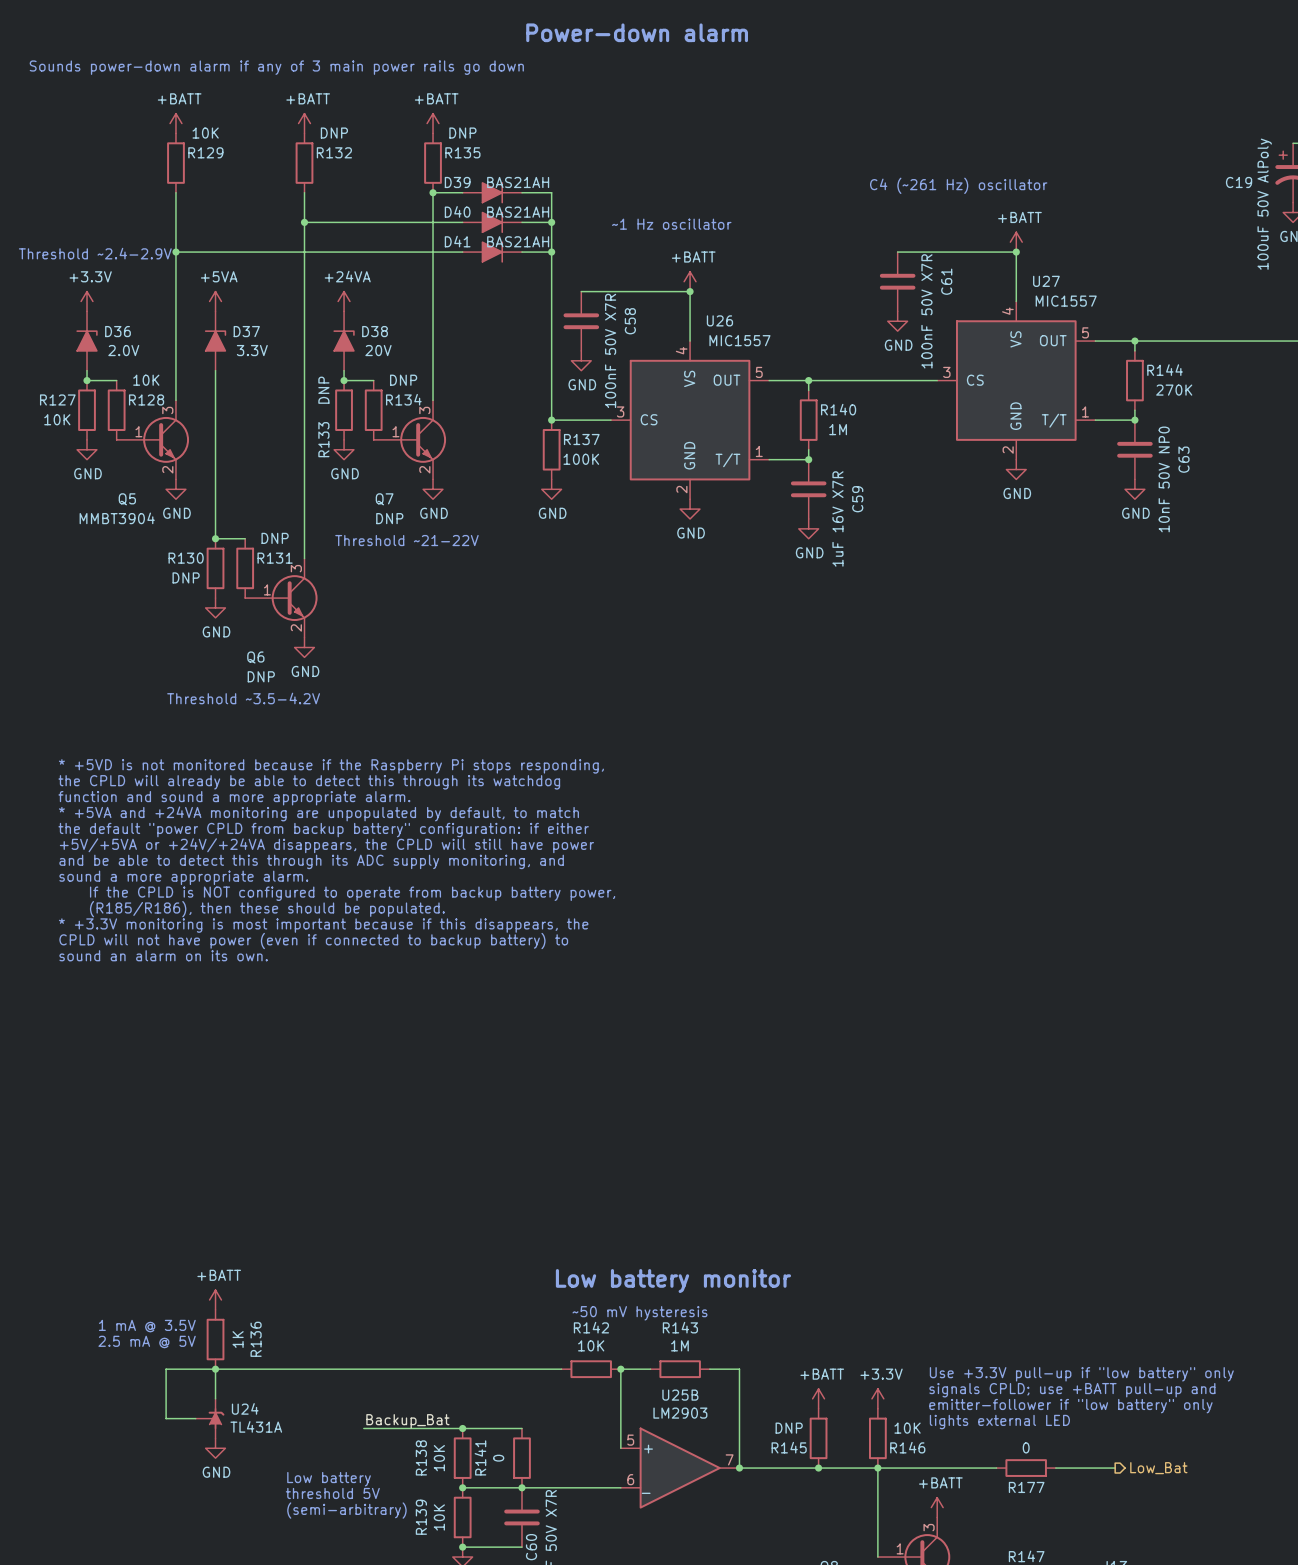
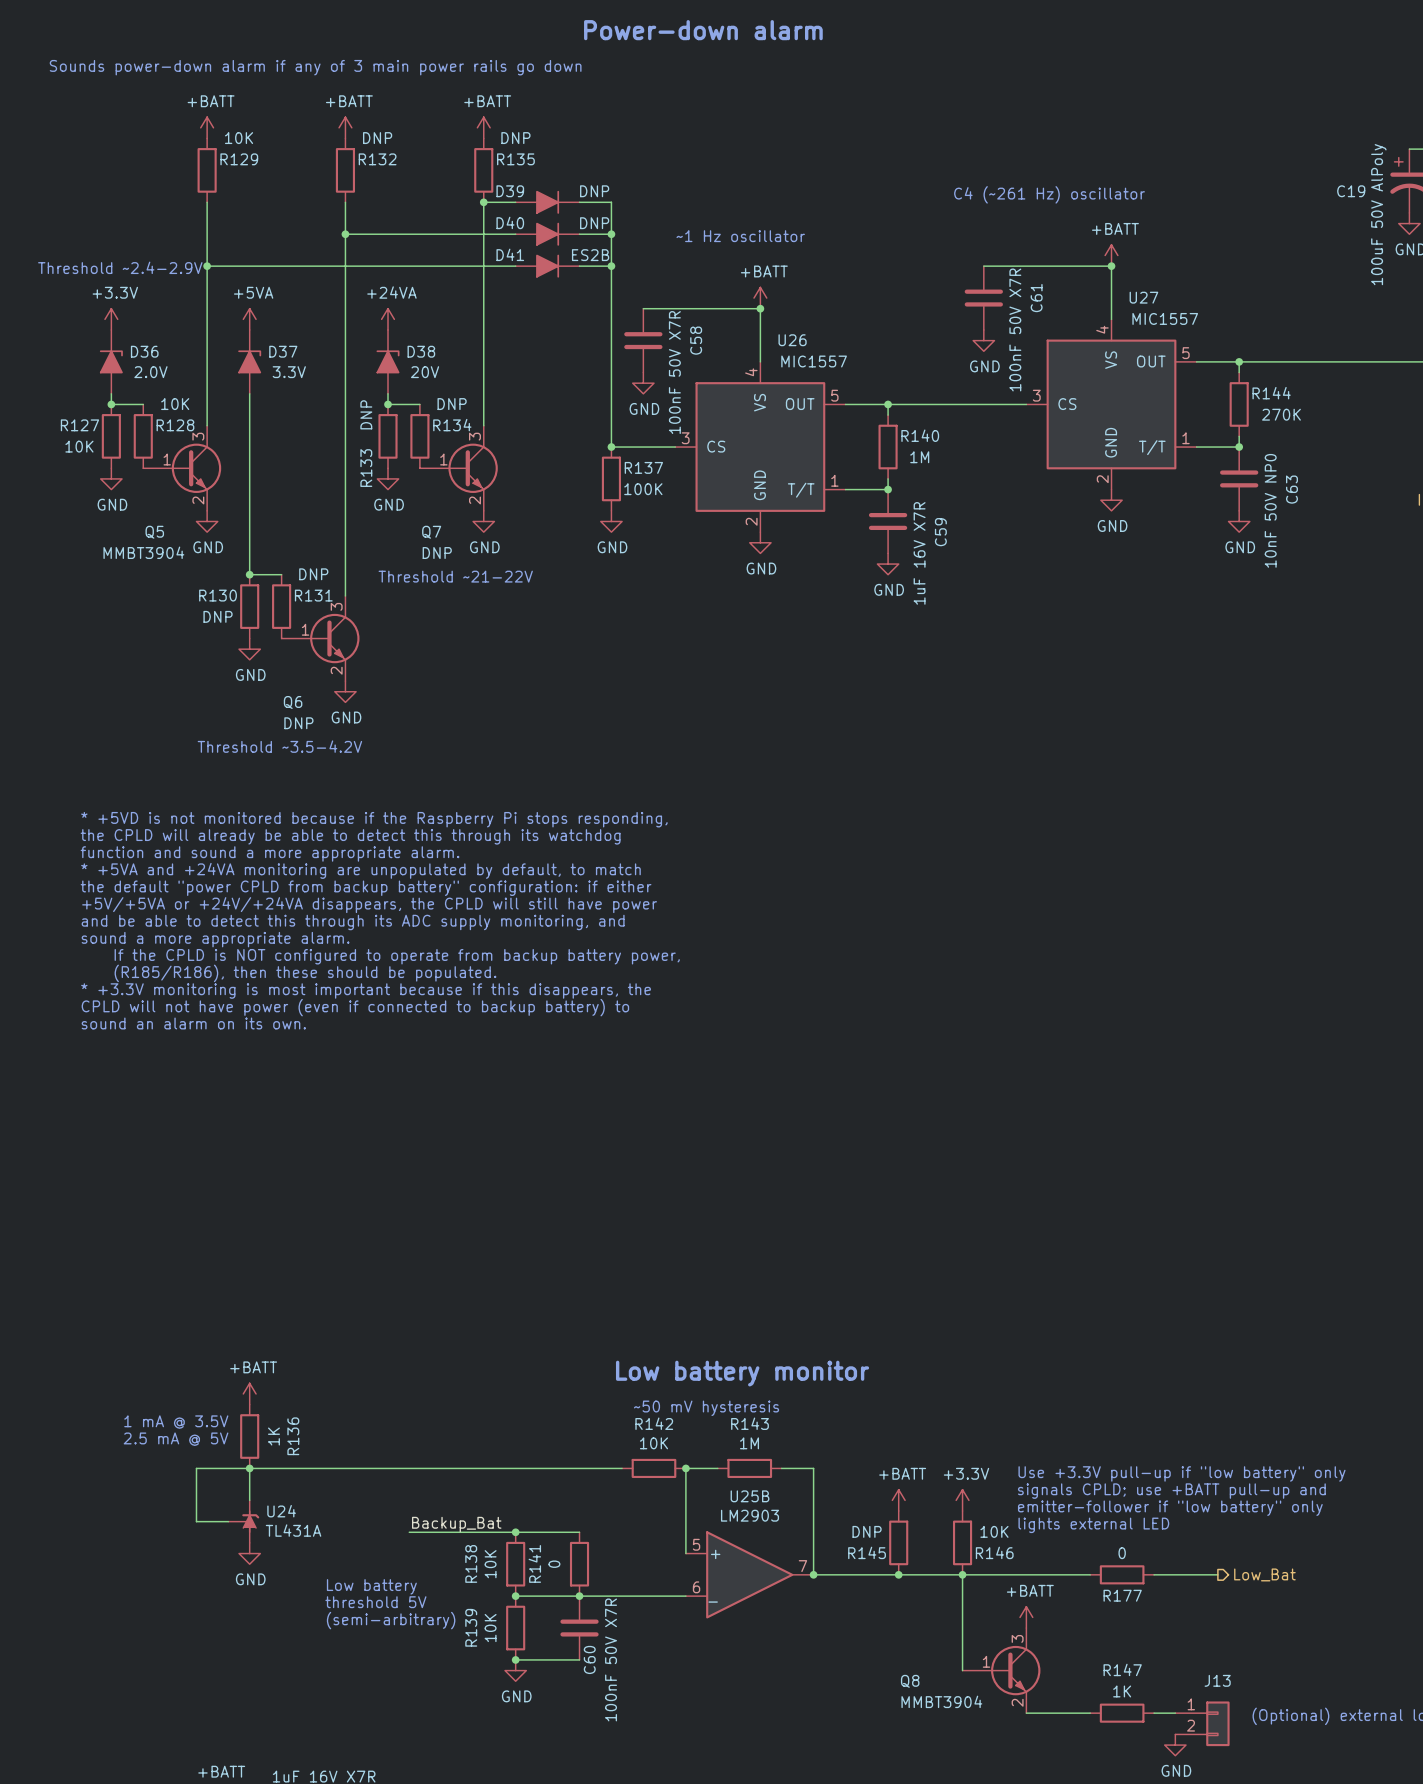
D39 value: BAS21AH (518, 182) -> DNP (594, 191)
D40 value: BAS21AH (518, 212) -> DNP (594, 223)
D41 value: BAS21AH (518, 241) -> ES2B (590, 255)

